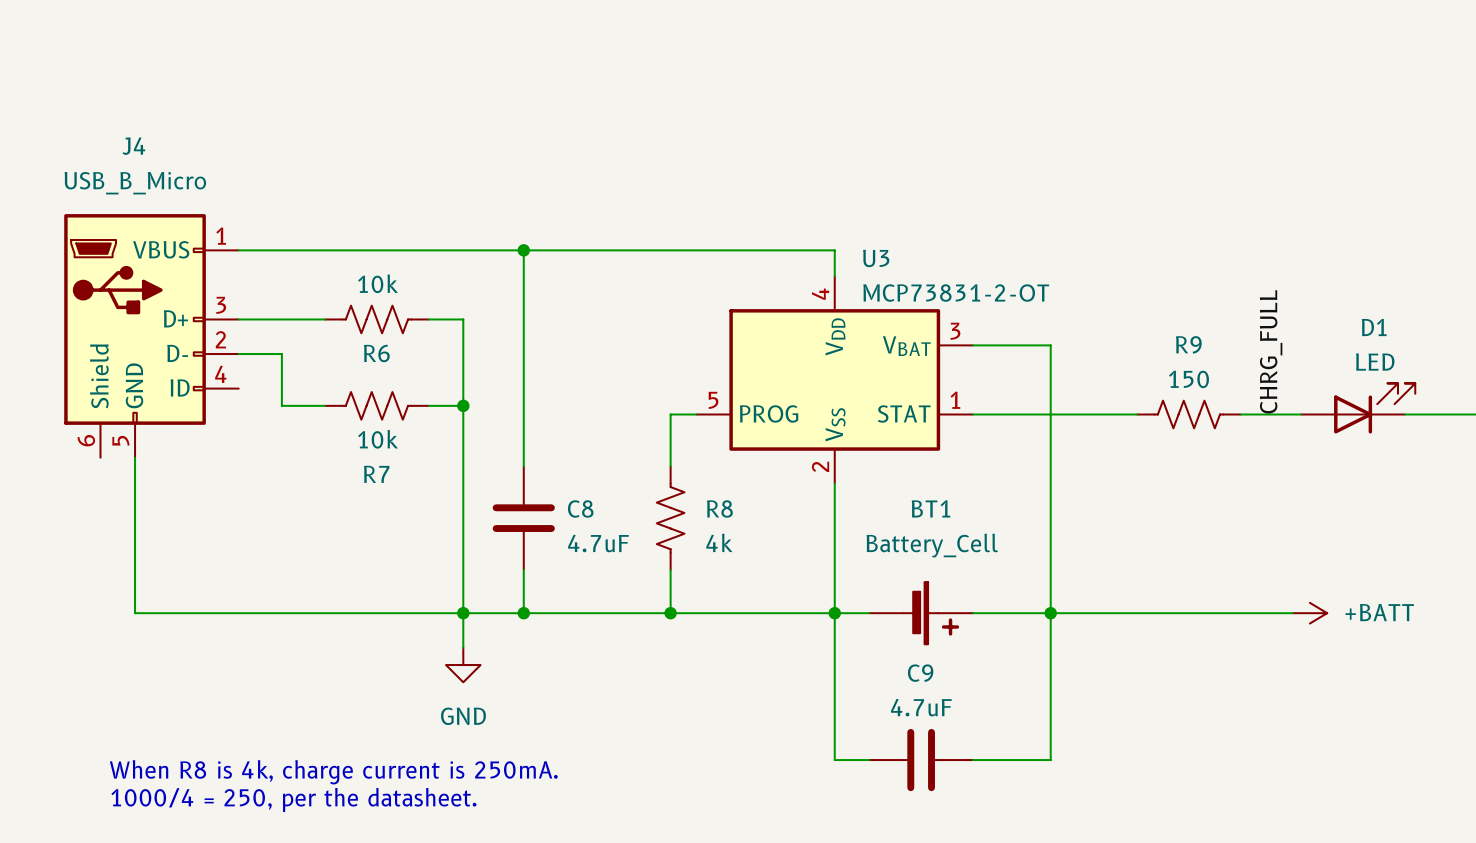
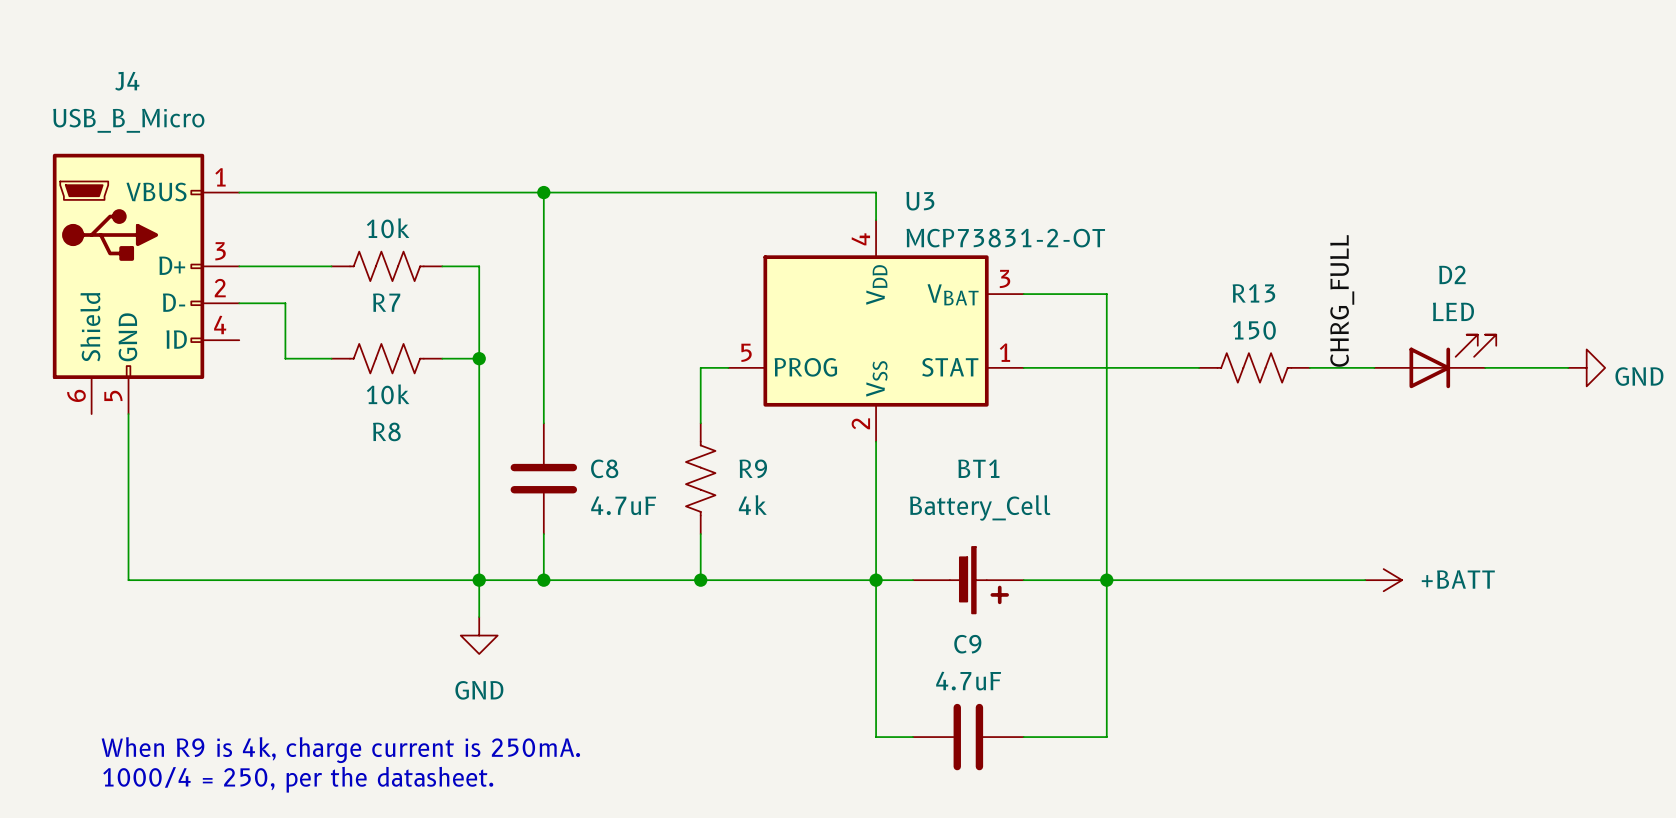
D1 name: D1 (1374, 327) -> D2 (1452, 274)
R9 name: R9 (1188, 344) -> R13 (1253, 293)
R6 name: R6 (376, 353) -> R7 (386, 302)
R7 name: R7 (376, 474) -> R8 (386, 431)
R8 name: R8 (719, 508) -> R9 (753, 468)
text: When R8 is 4k, charge current is 250mA. (333, 772) -> When R9 is 4k, charge current is 250mA. (340, 750)

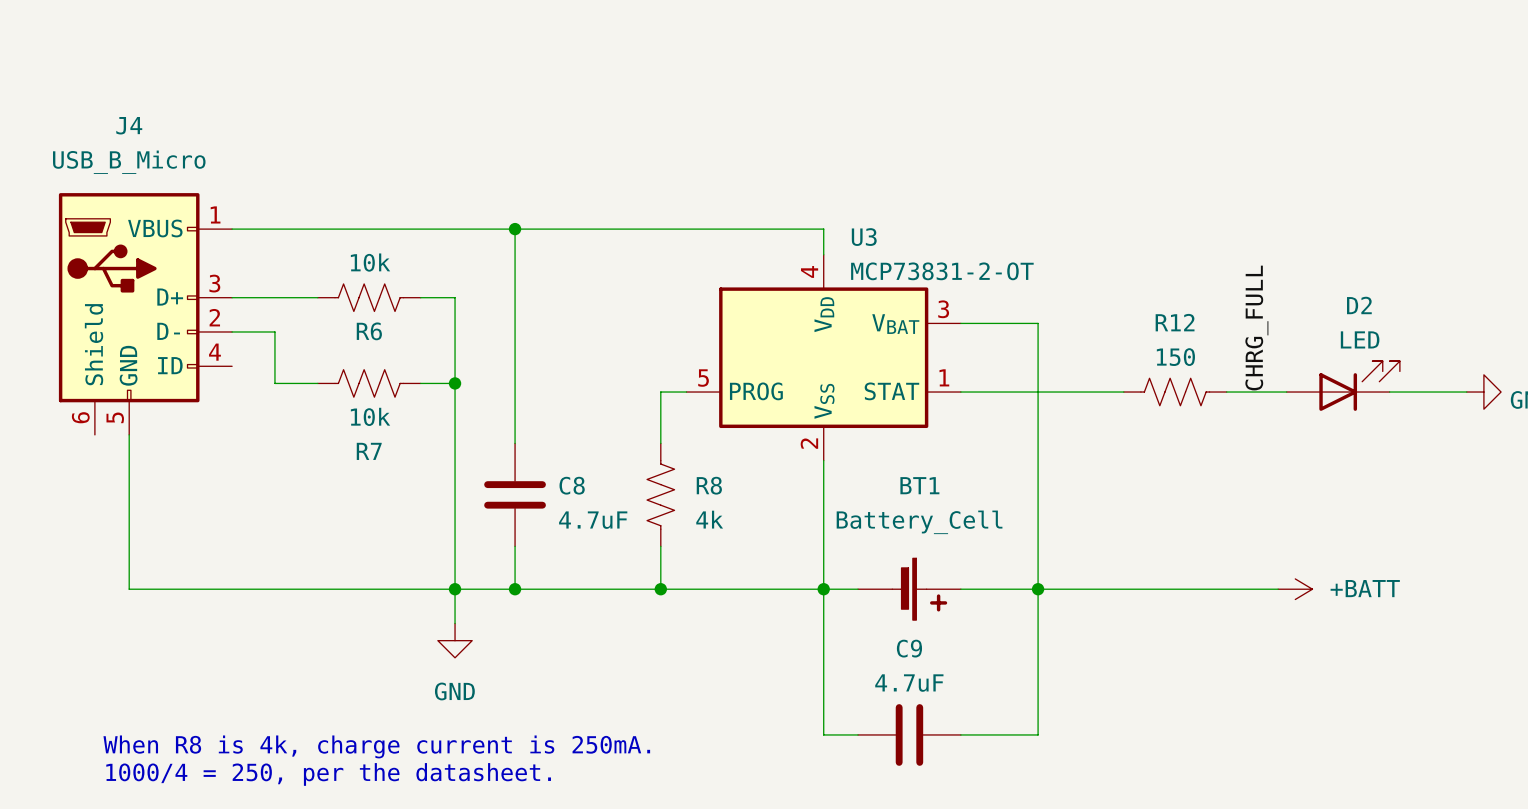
R13 name: R13 (1253, 293) -> R12 (1175, 322)
R7 name: R7 (386, 302) -> R6 (369, 331)
R8 name: R8 (386, 431) -> R7 (369, 451)
R9 name: R9 (753, 468) -> R8 (709, 485)
text: When R9 is 4k, charge current is 250mA. (340, 750) -> When R8 is 4k, charge current is 250mA. (376, 746)

